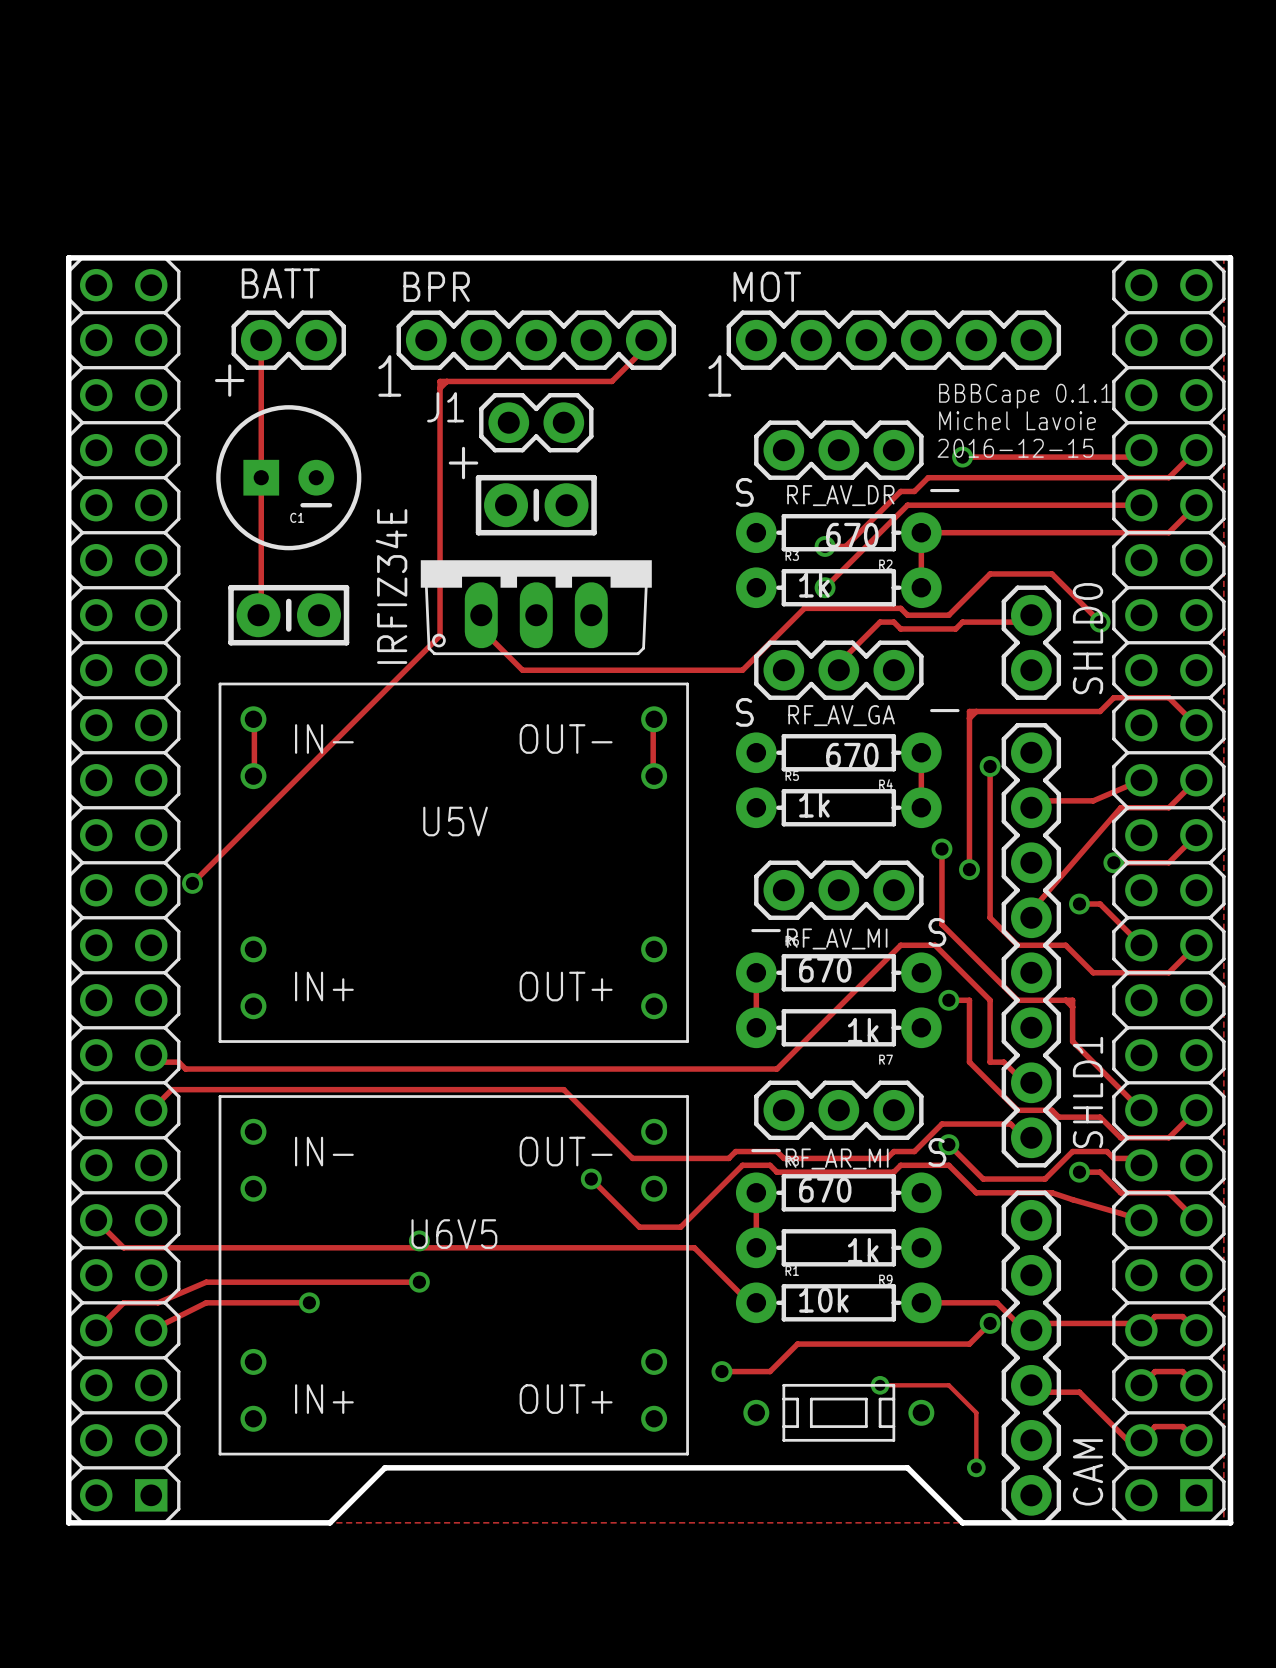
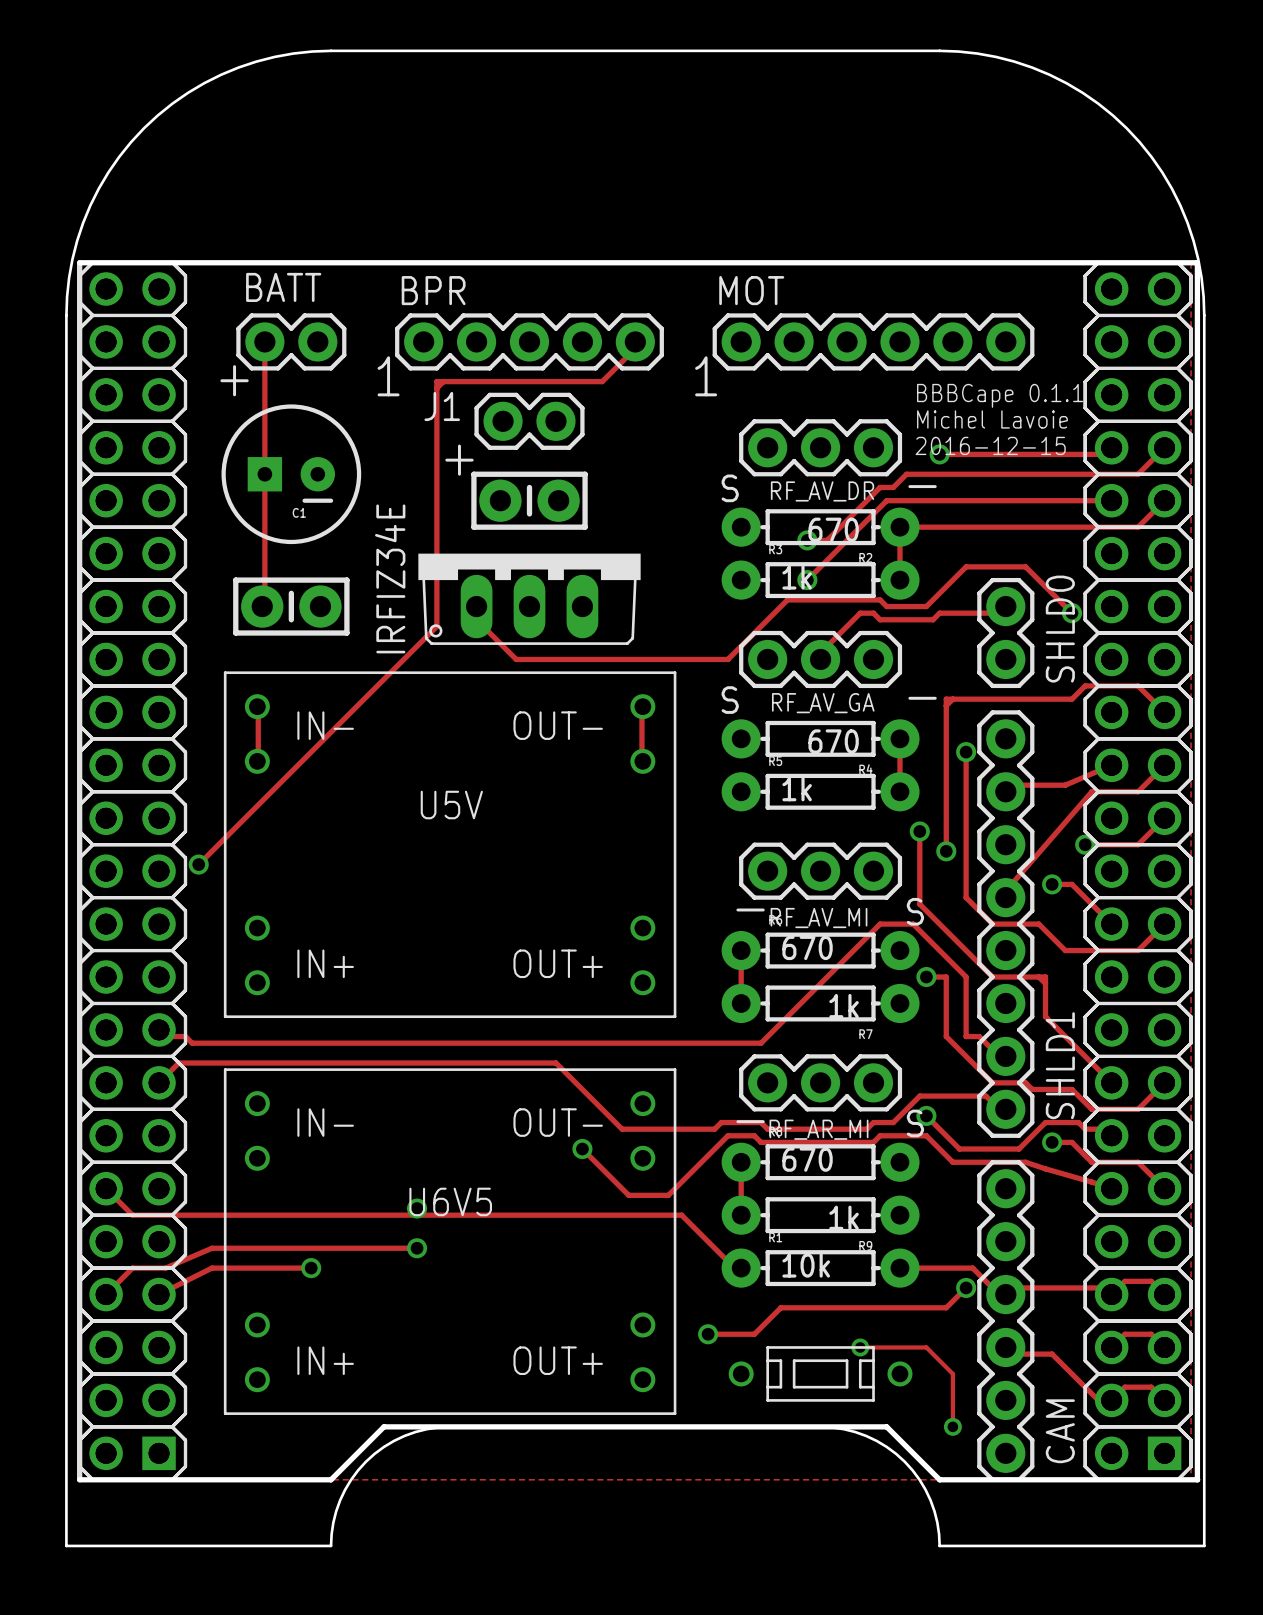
board edge: (68, 257) (68, 1522) -> none
line: none -> (79, 262) (79, 1479)
part: none -> (635, 798)

